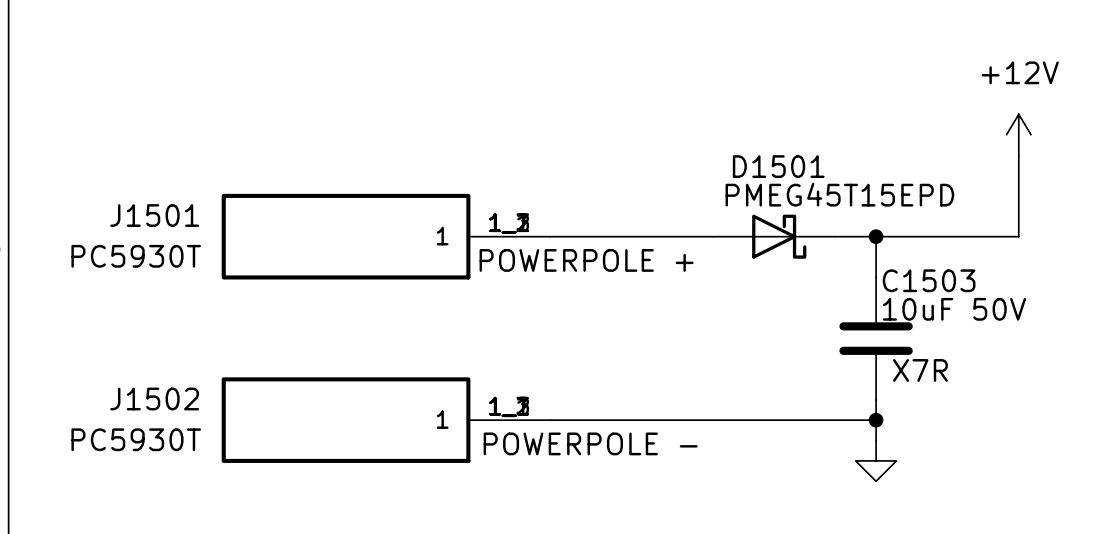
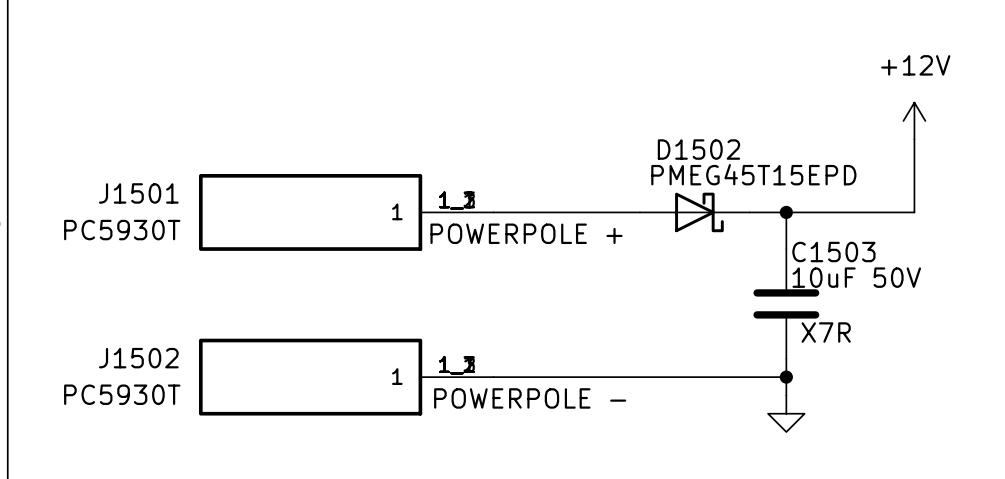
D1501 name: D1501 (778, 166) -> D1502 (698, 149)

